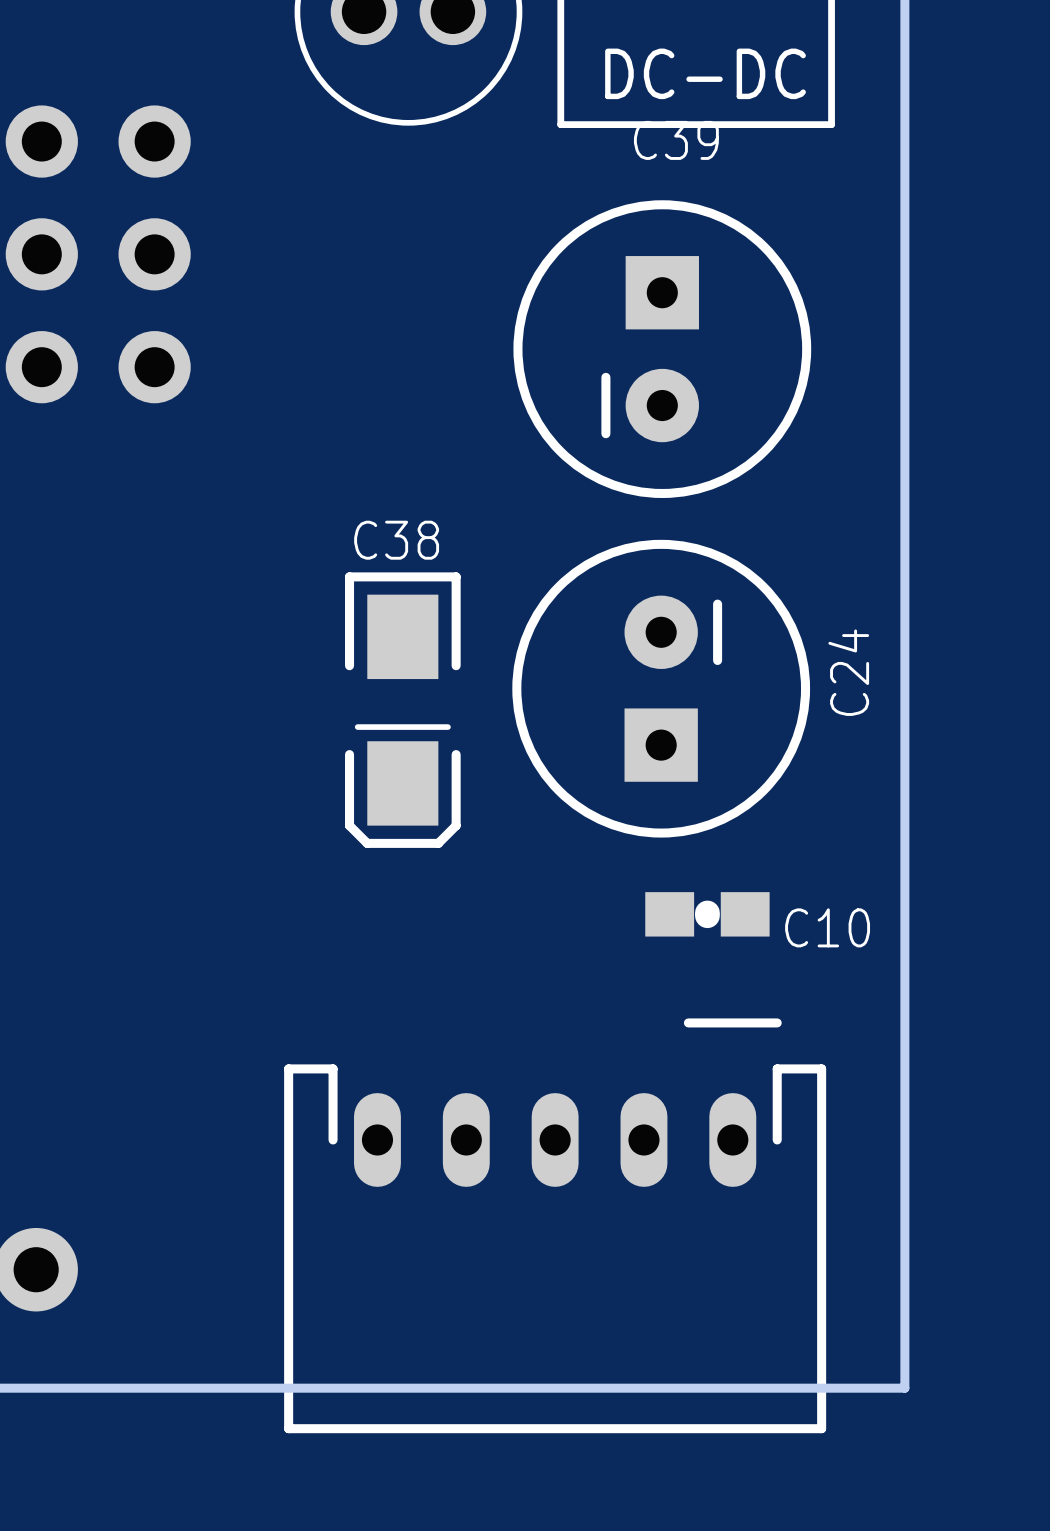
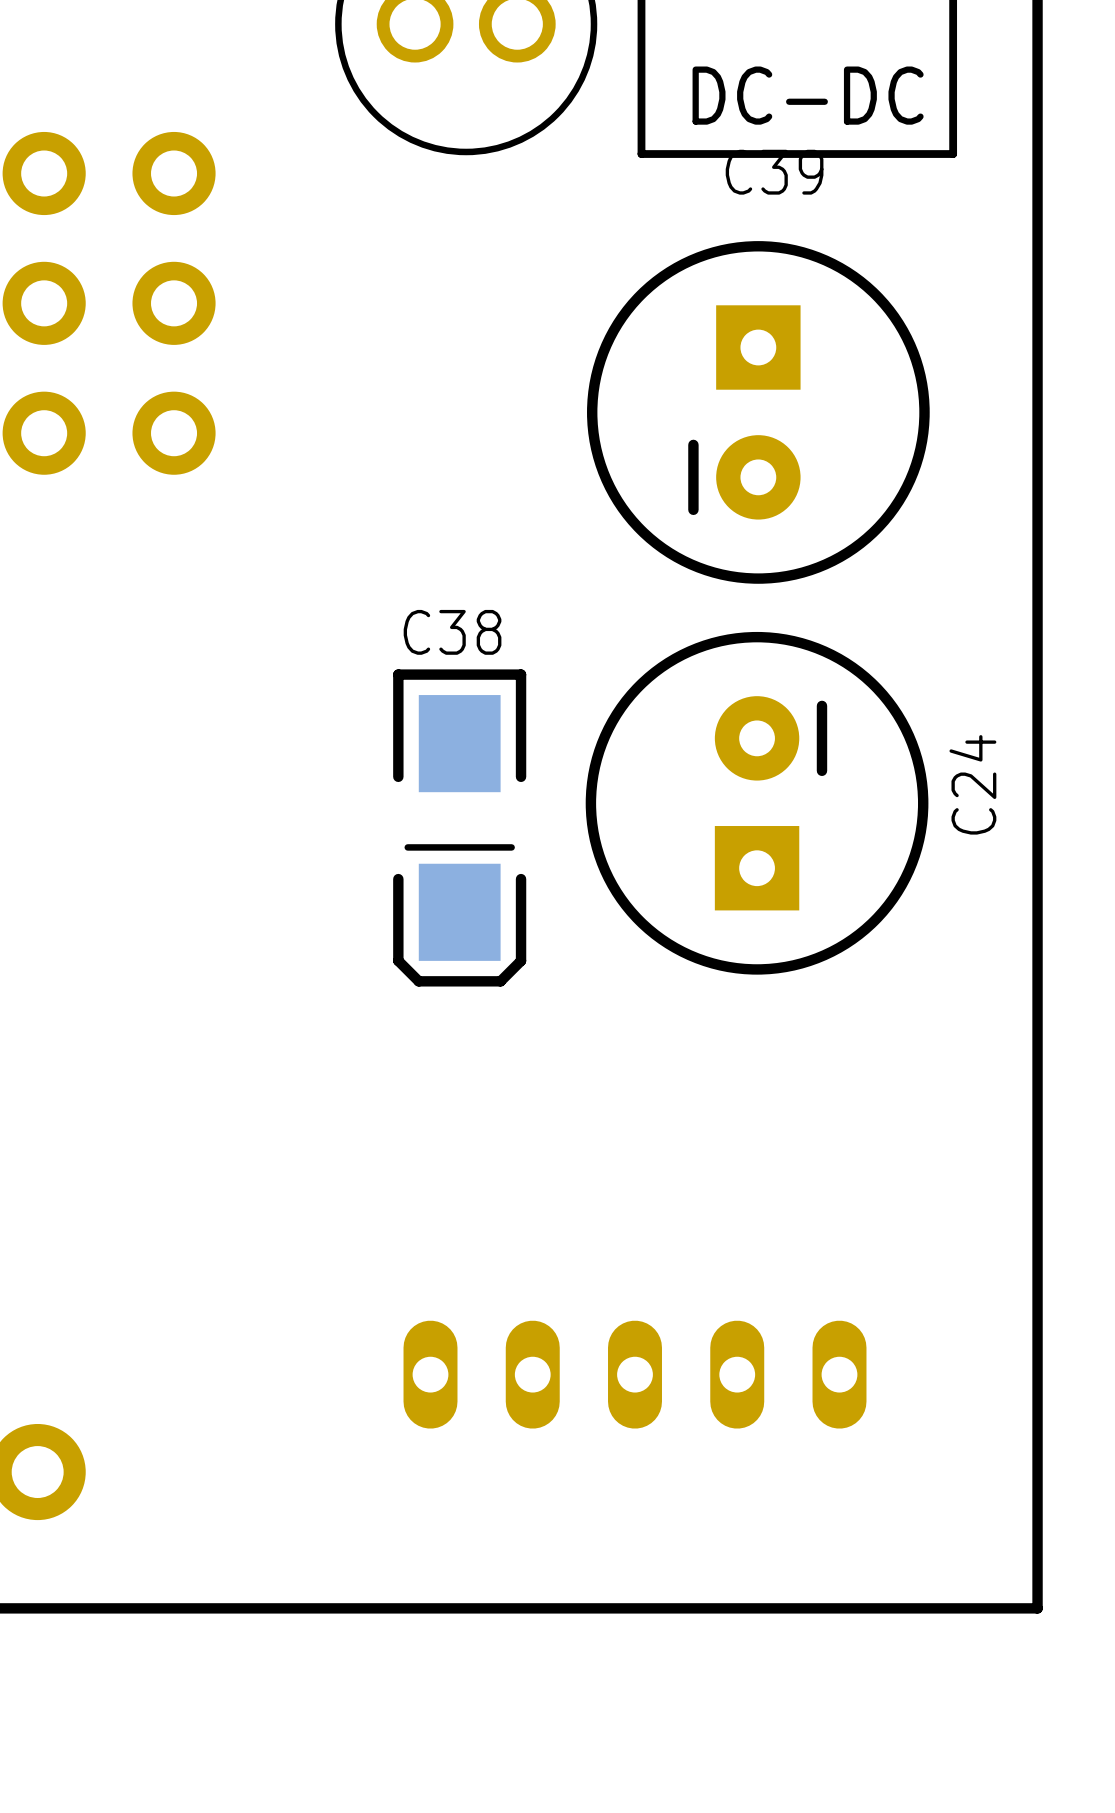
C10: (707, 914) -> none
part side: bottom (555, 1225) -> top (635, 1374)

